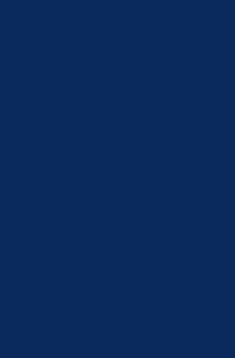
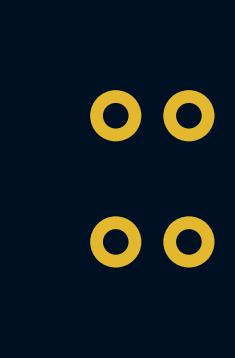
part: none -> (152, 115)
part: none -> (152, 241)

